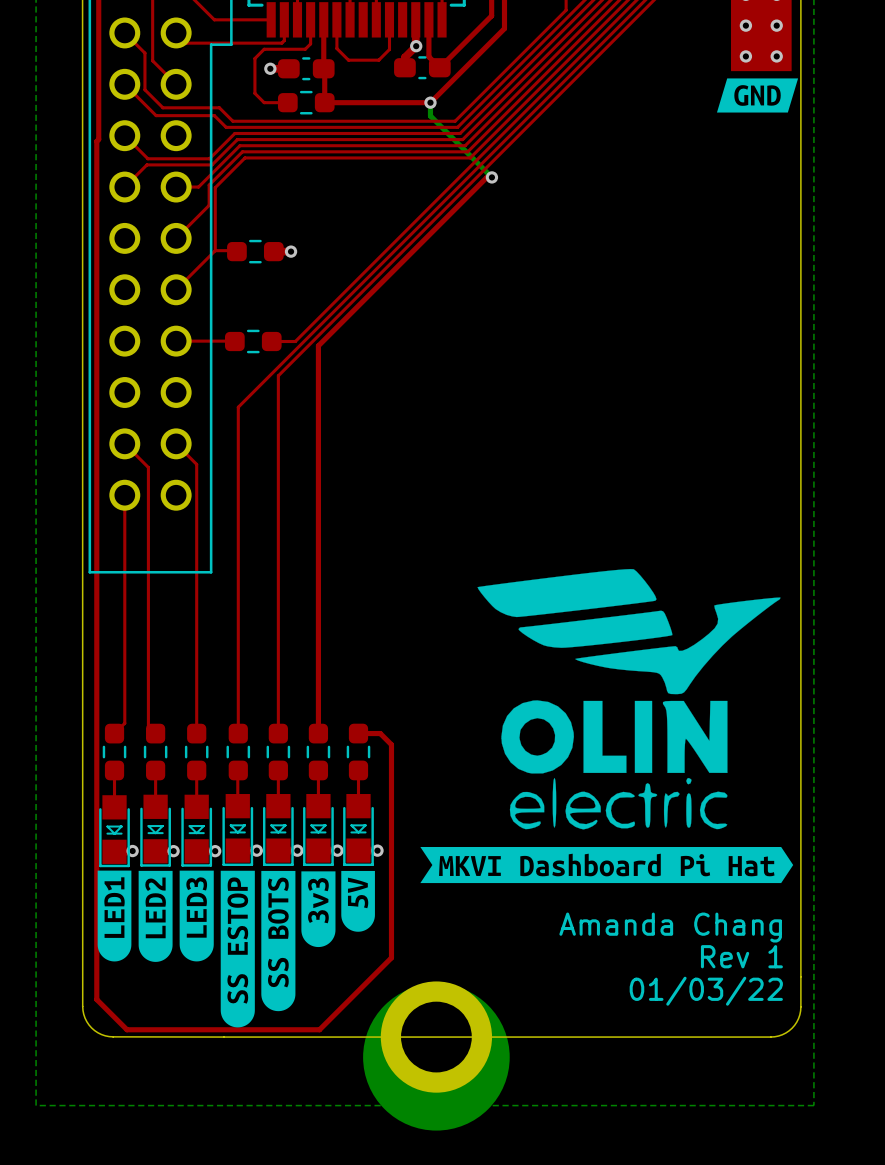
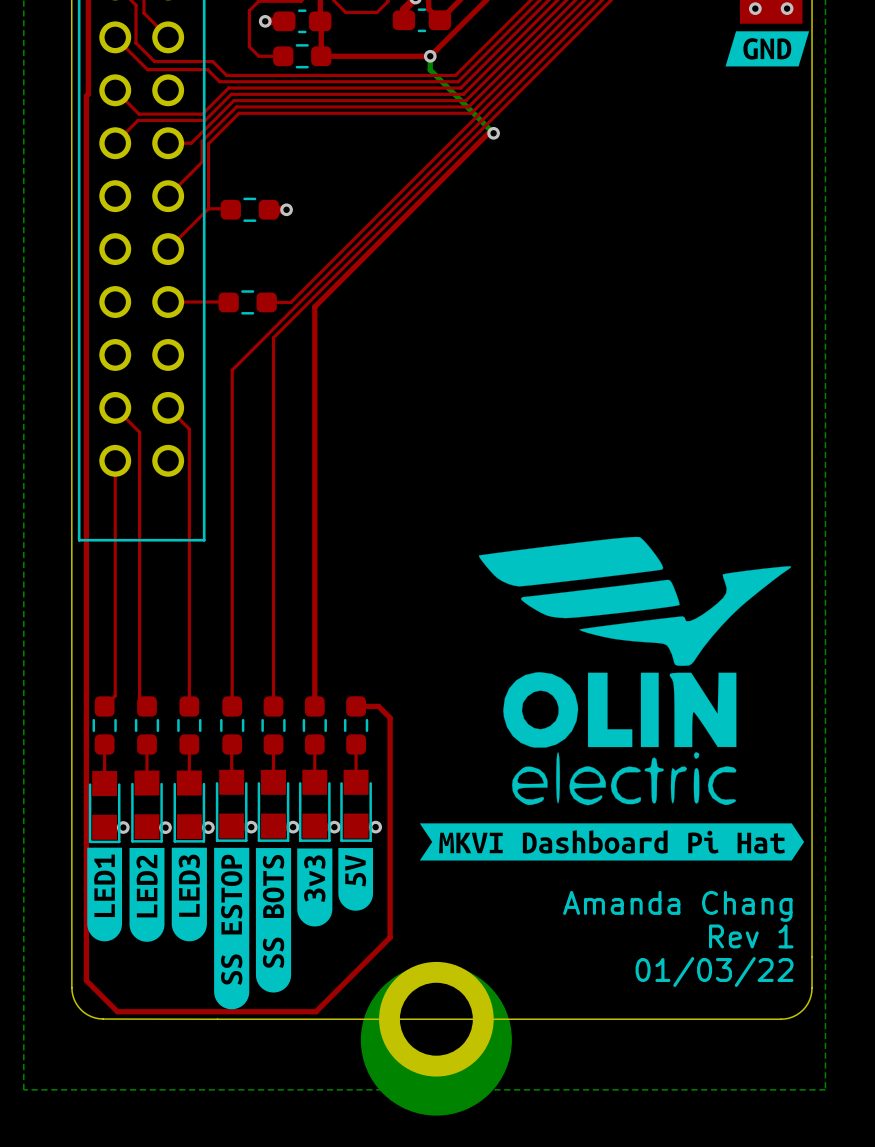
part footprint: [140, 794, 171, 867] -> [131, 770, 163, 843]
part footprint: [181, 794, 213, 867] -> [173, 770, 206, 843]
part footprint: [222, 794, 254, 867] -> [215, 769, 248, 842]
part footprint: [263, 794, 294, 867] -> [257, 769, 290, 842]
part footprint: [303, 794, 334, 867] -> [298, 769, 331, 842]
part footprint: [343, 794, 374, 867] -> [340, 769, 372, 842]
part footprint: [99, 795, 130, 868] -> [88, 771, 121, 844]

